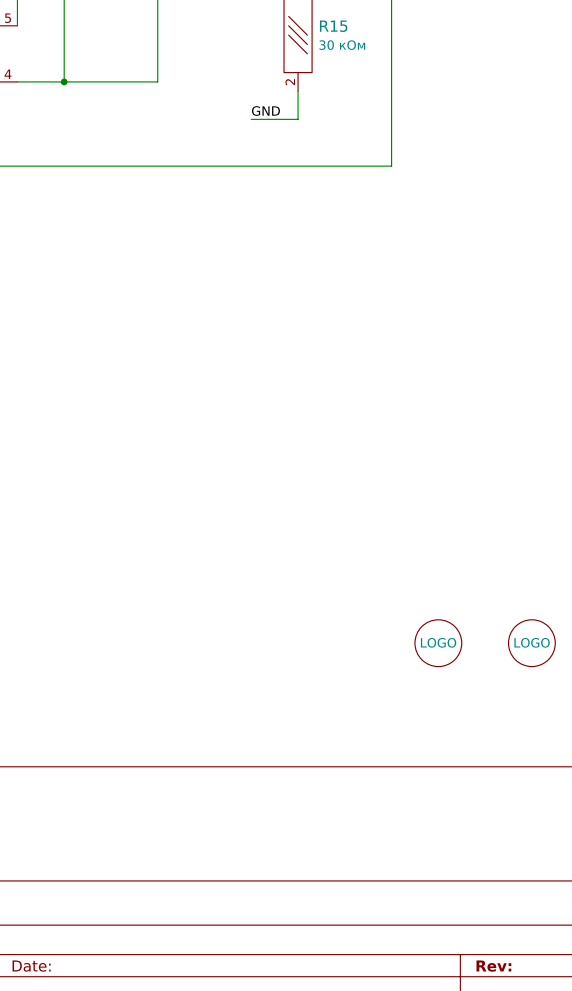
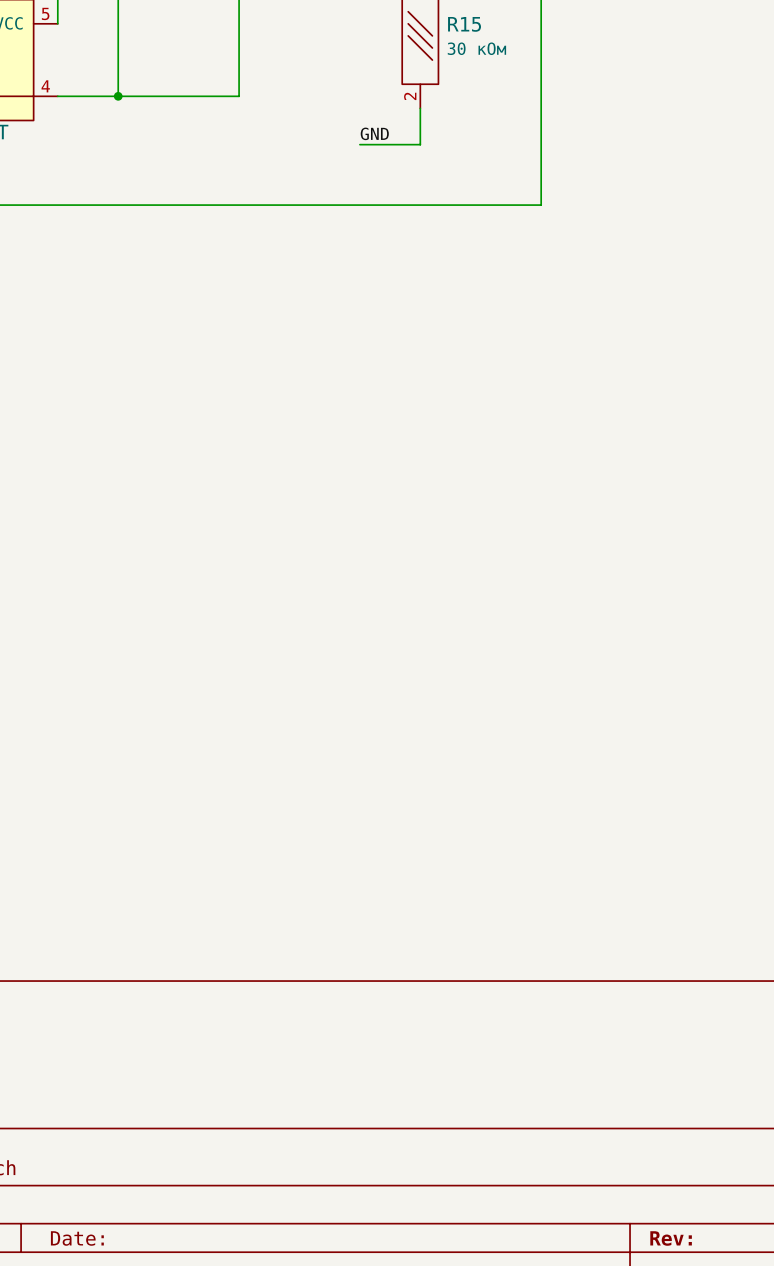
part: LOGO (438, 643) -> none
part: LOGO (531, 643) -> none

